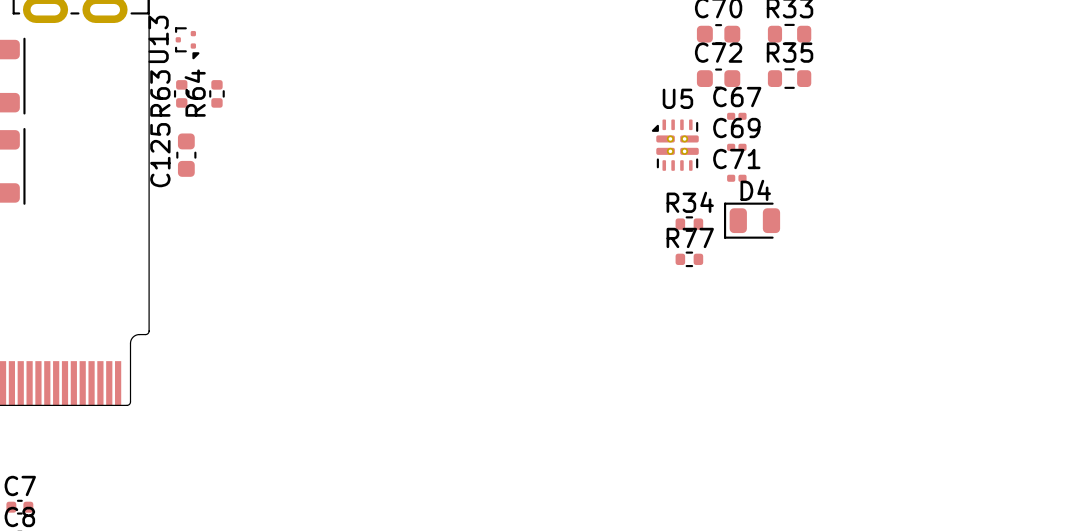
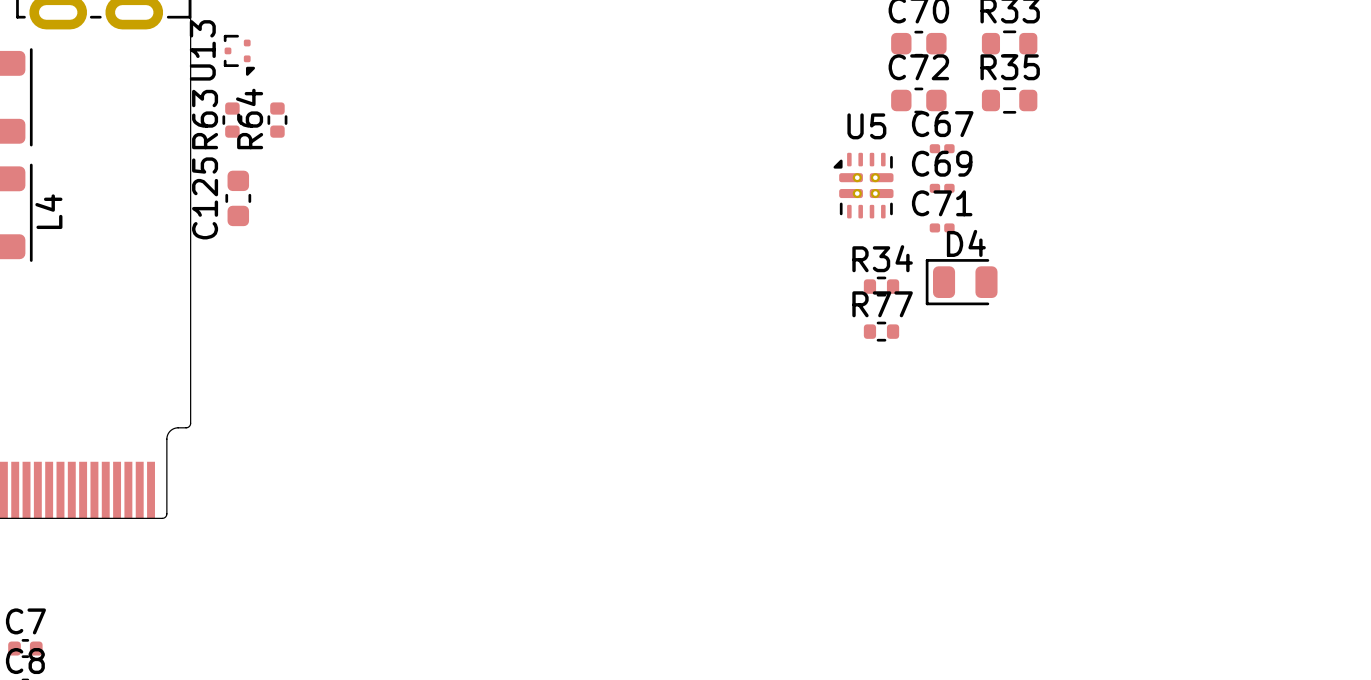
L4 name: none -> L4 (48, 211)

